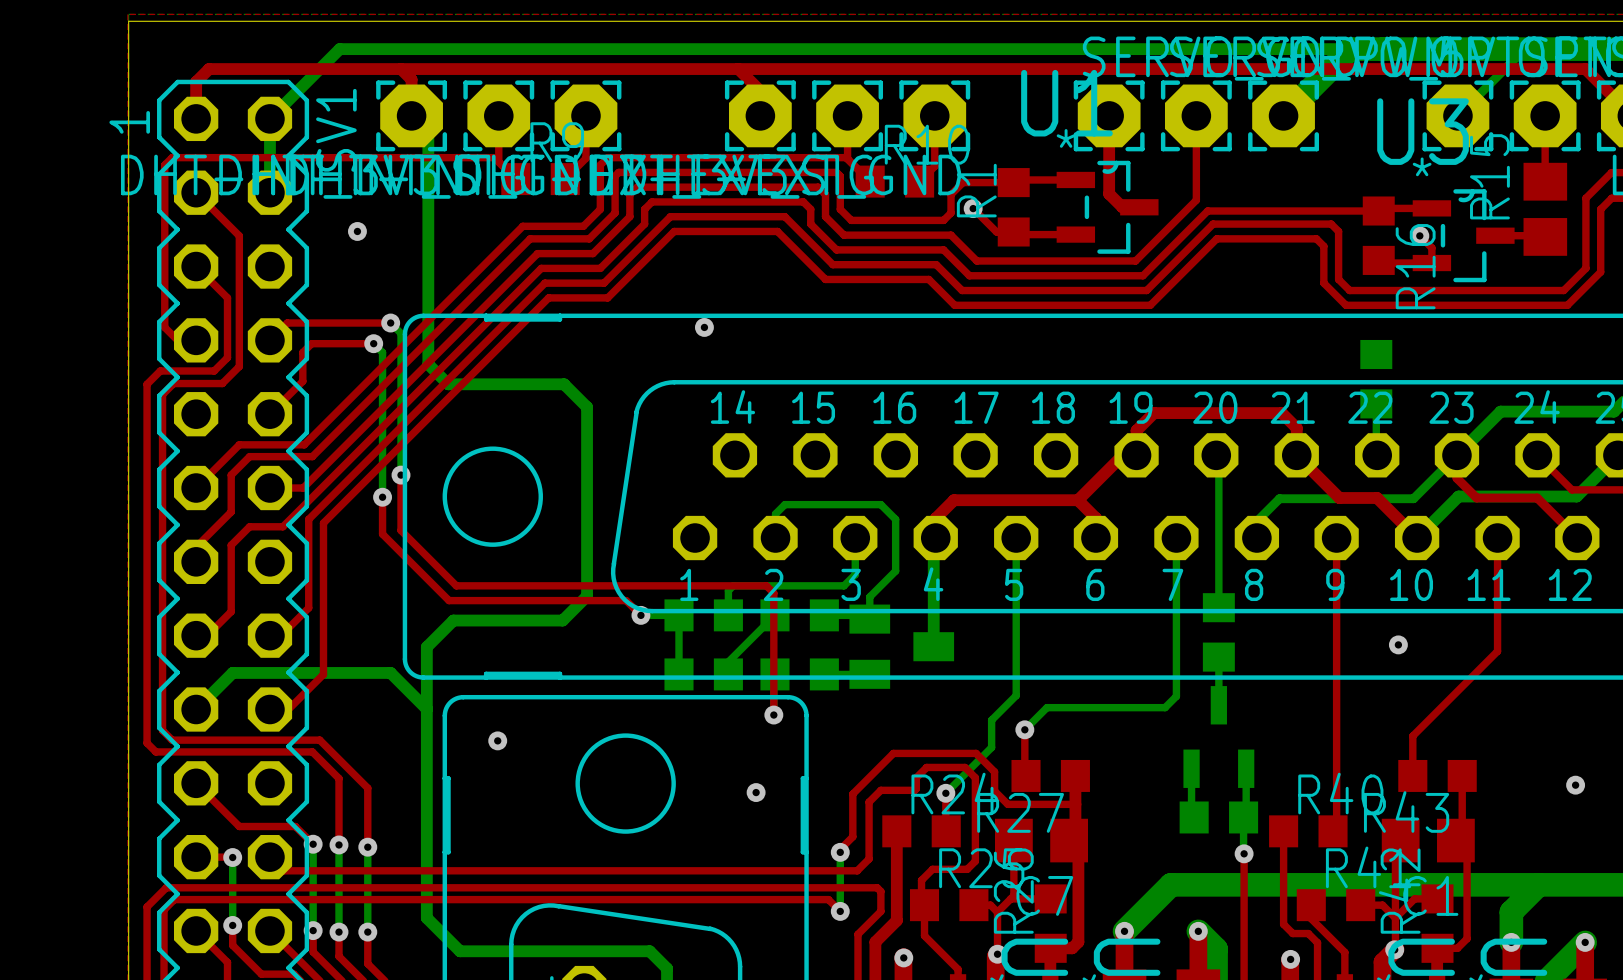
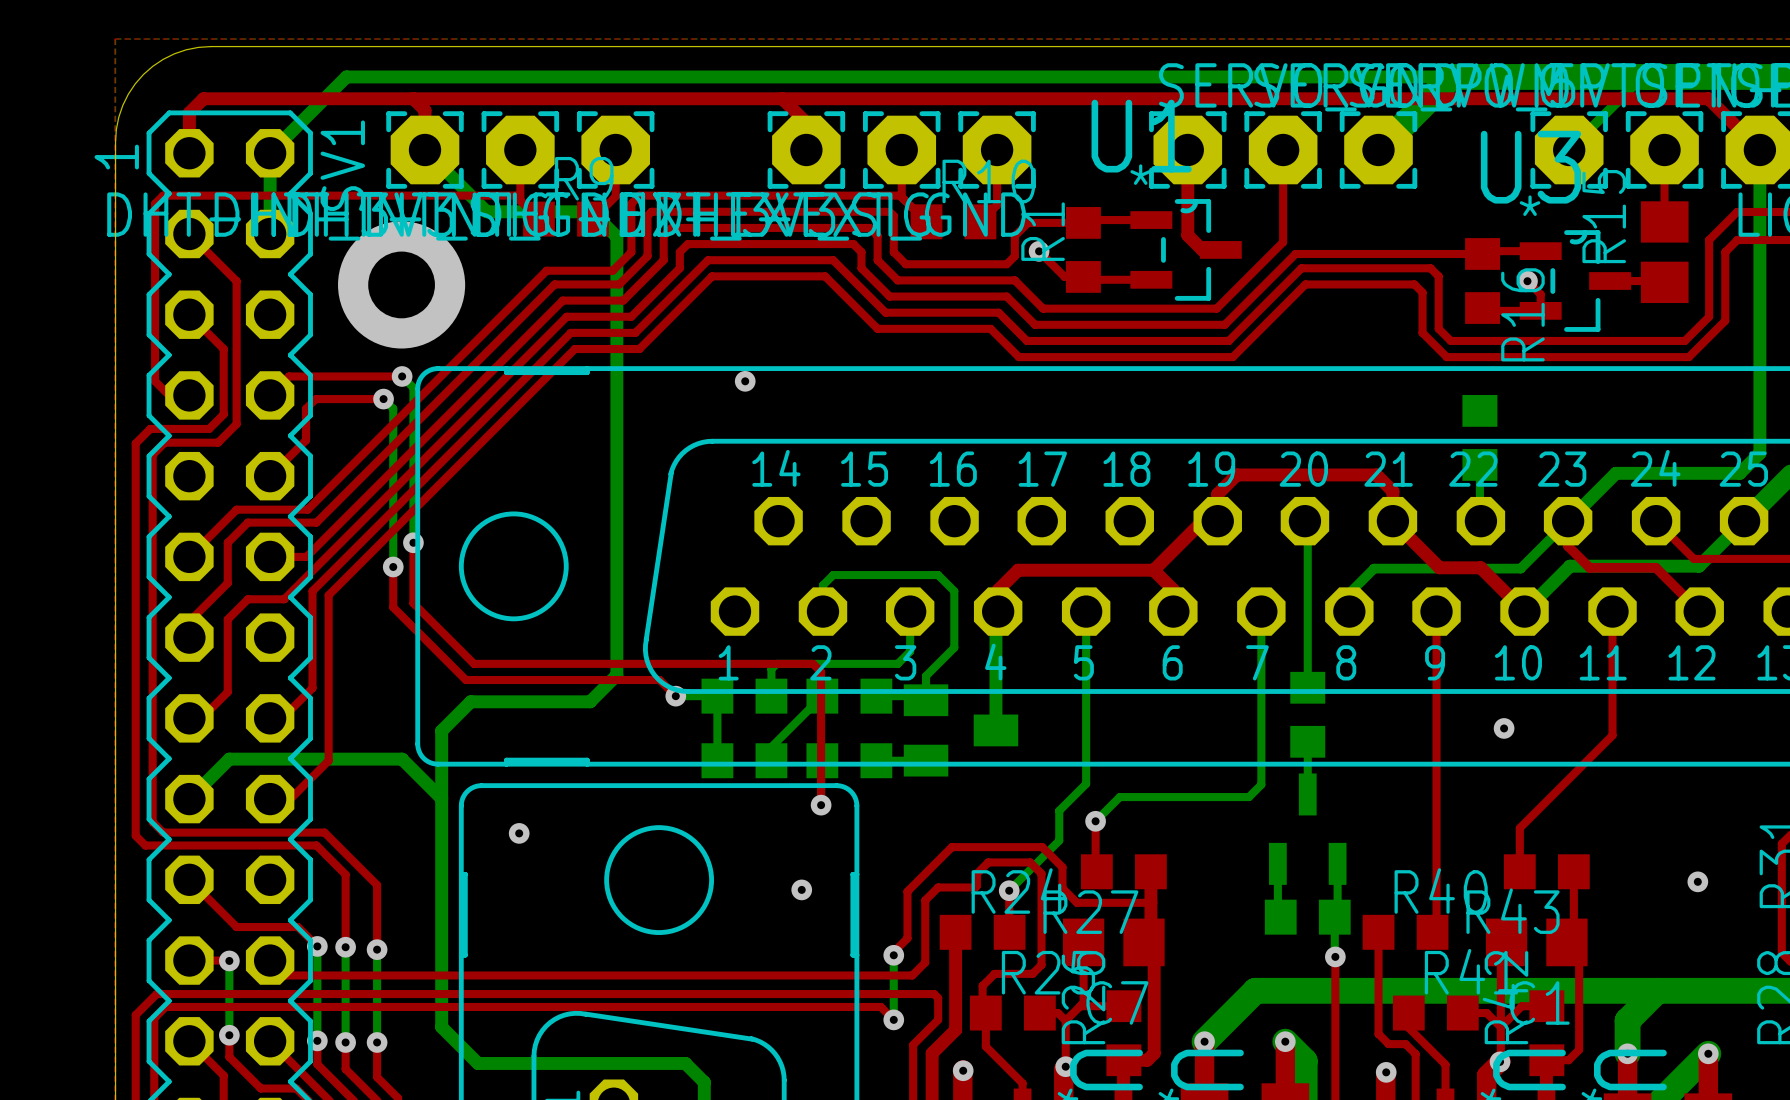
board edge: (215, 21) (128, 21) (128, 108) -> (210, 46) (186, 49) (174, 53) (152, 66) (143, 74) (135, 83) (122, 105) (118, 117) (115, 141)
bottom track: (428, 132) (428, 364) (448, 384) (564, 384) (587, 407) -> (443, 168) (486, 211) (591, 211) (616, 236) (616, 468)
via: (357, 231) -> none
via: none -> (401, 284)

